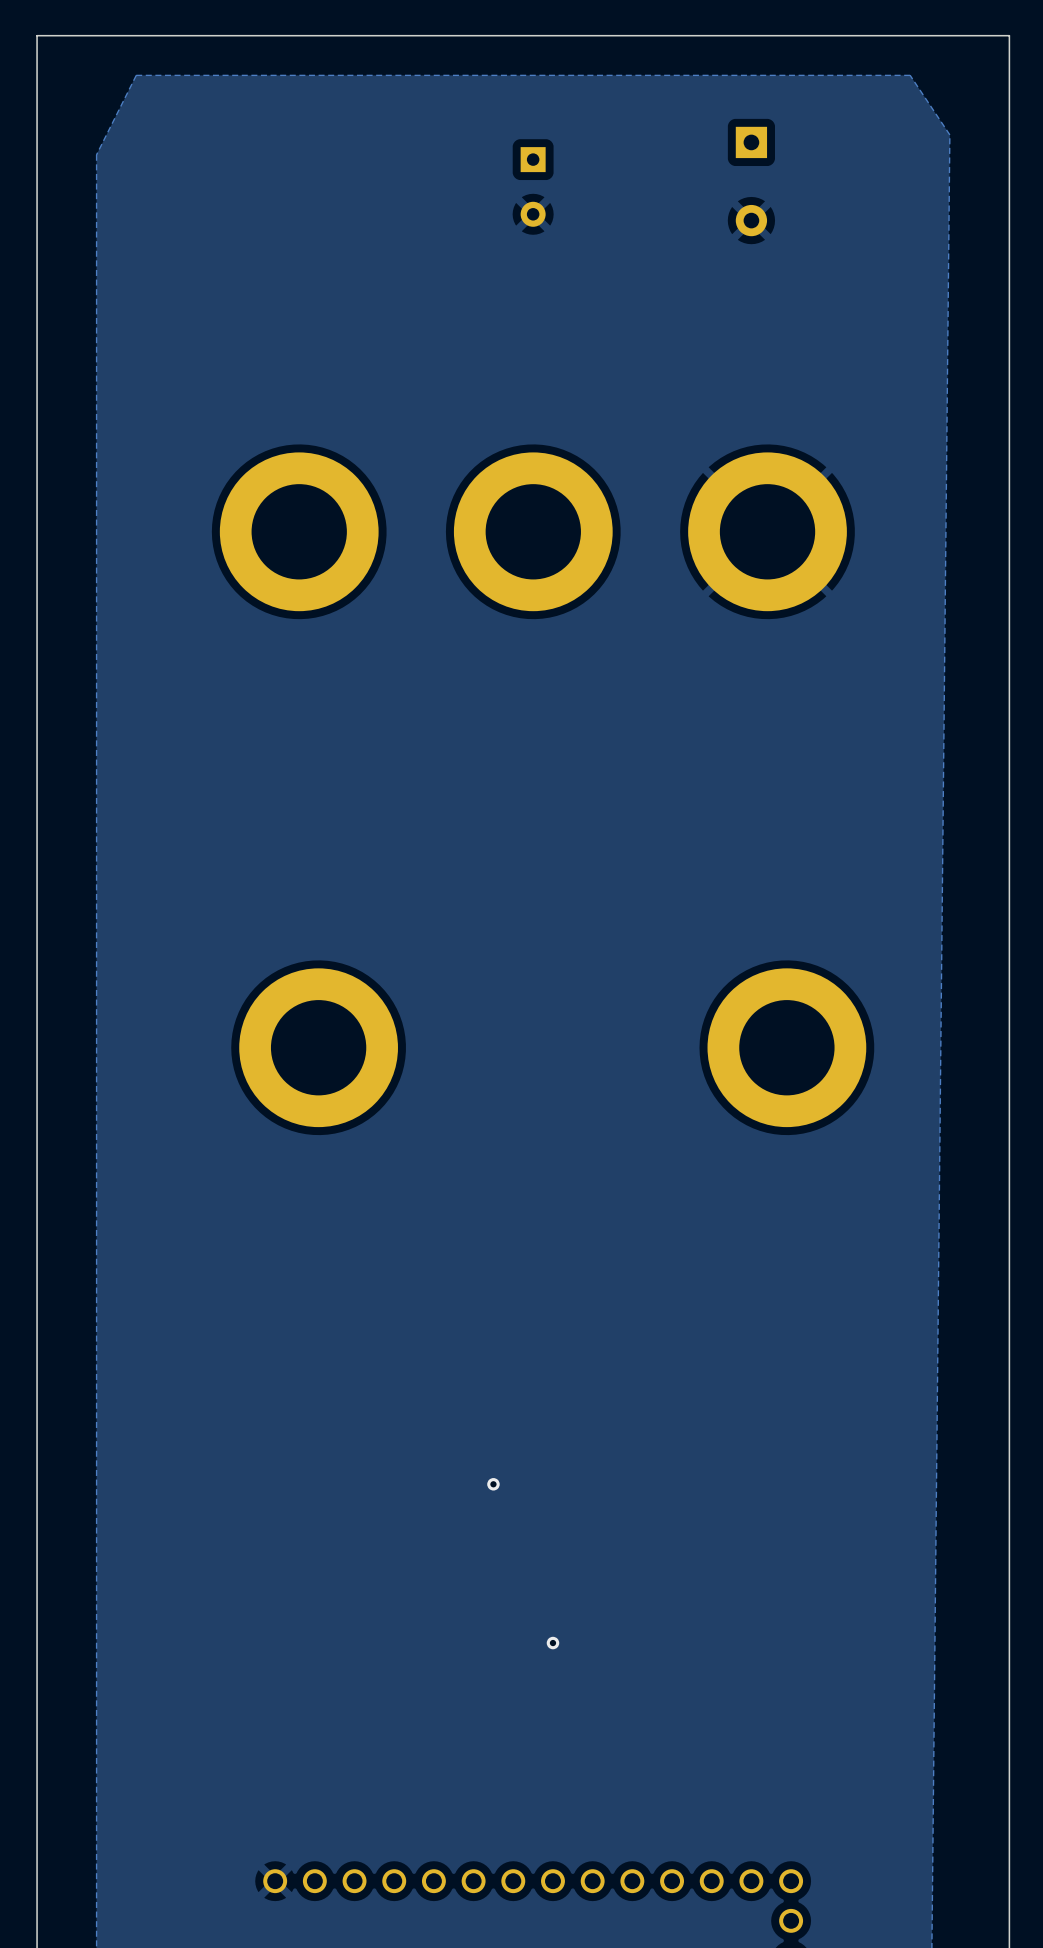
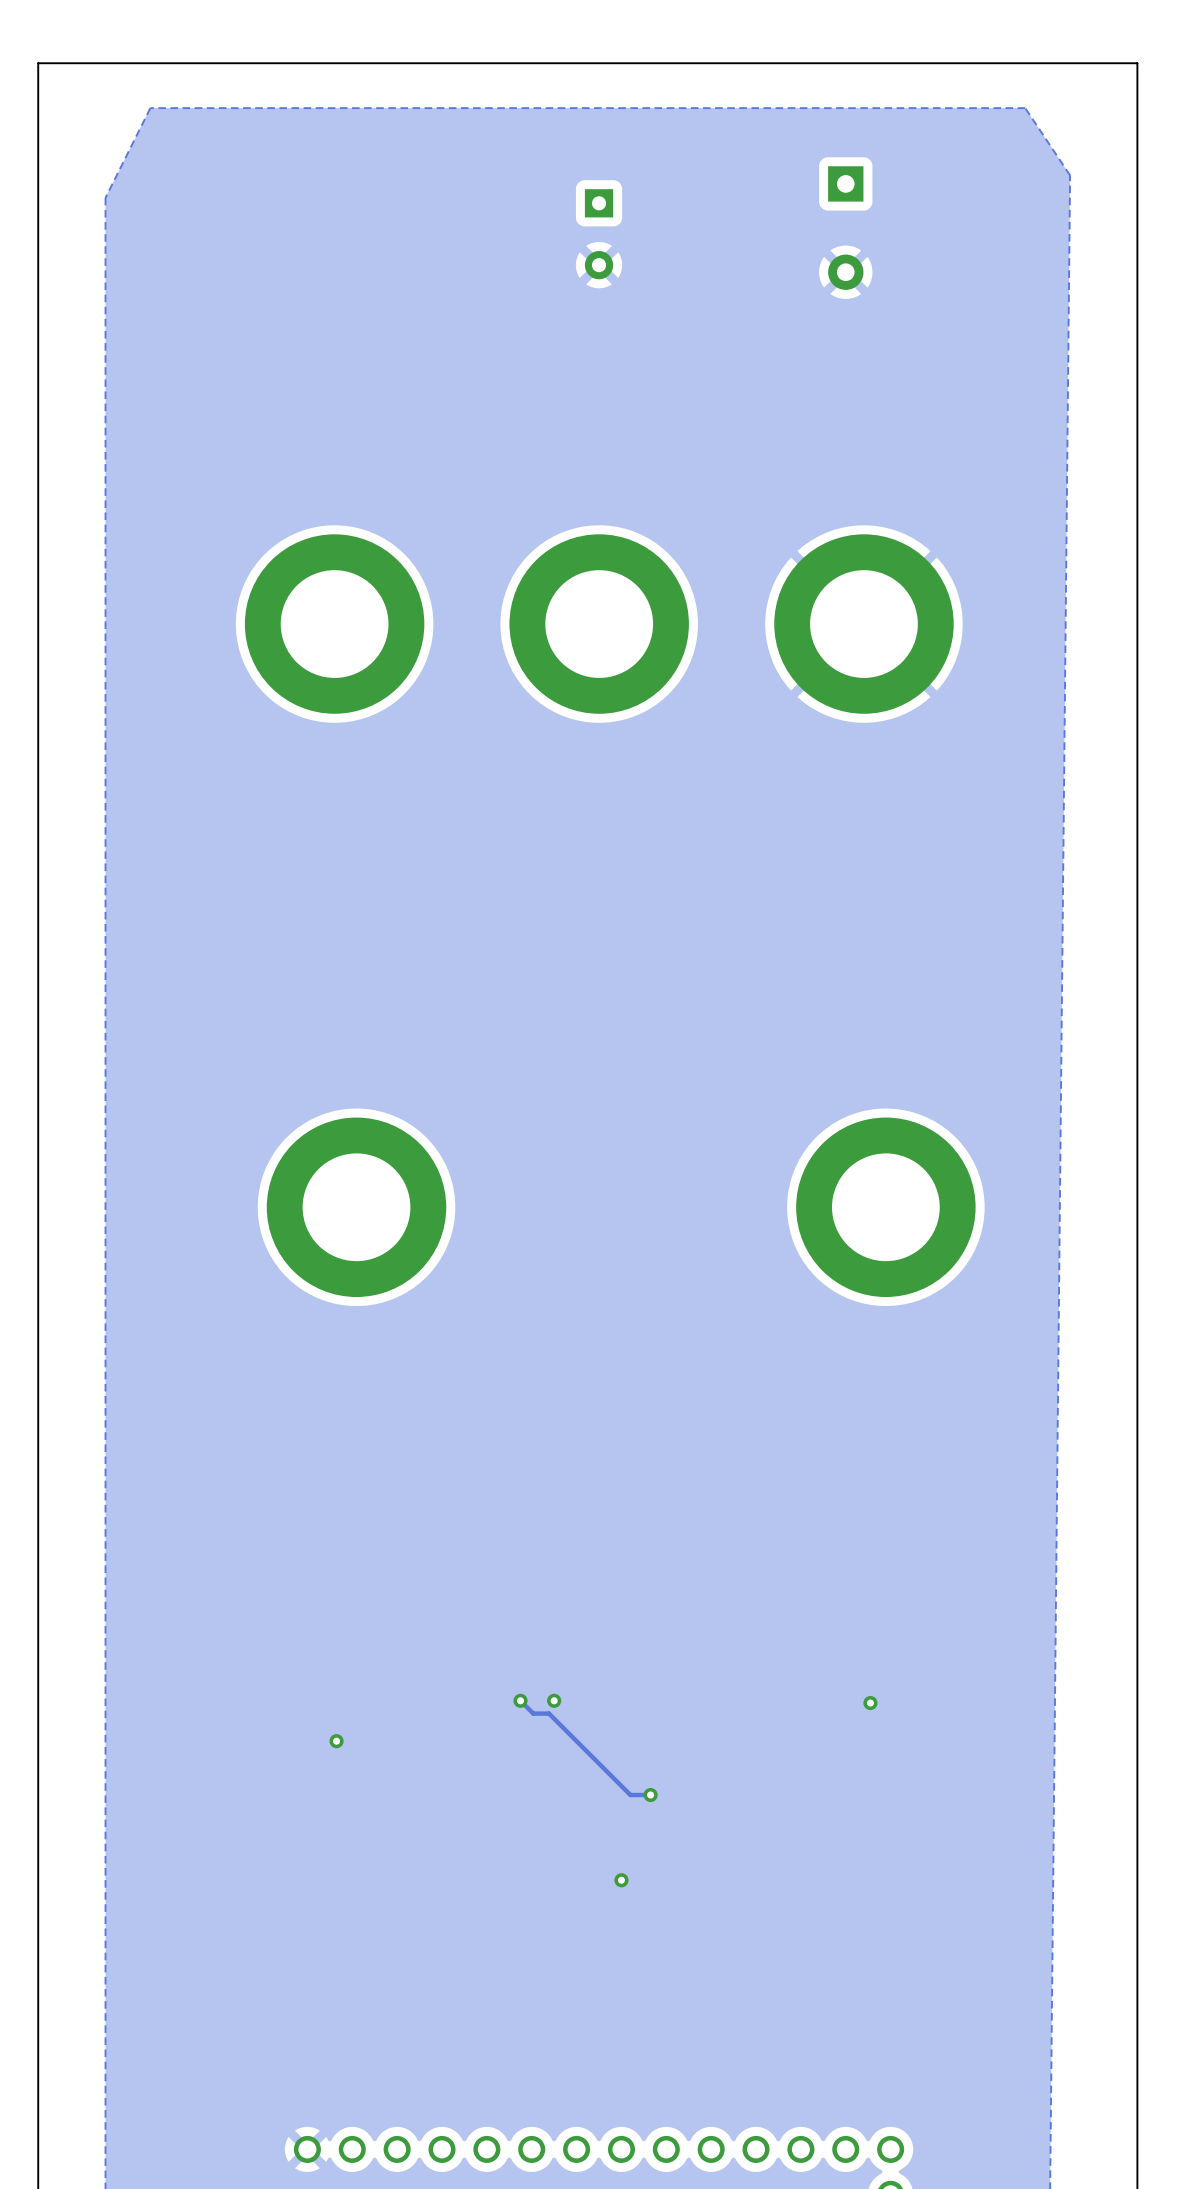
track: none -> (520, 1700) (533, 1713) (549, 1713) (630, 1795) (650, 1795)
via: none -> (520, 1700)
via: none -> (870, 1703)
via: none -> (336, 1741)
via: none -> (650, 1795)

